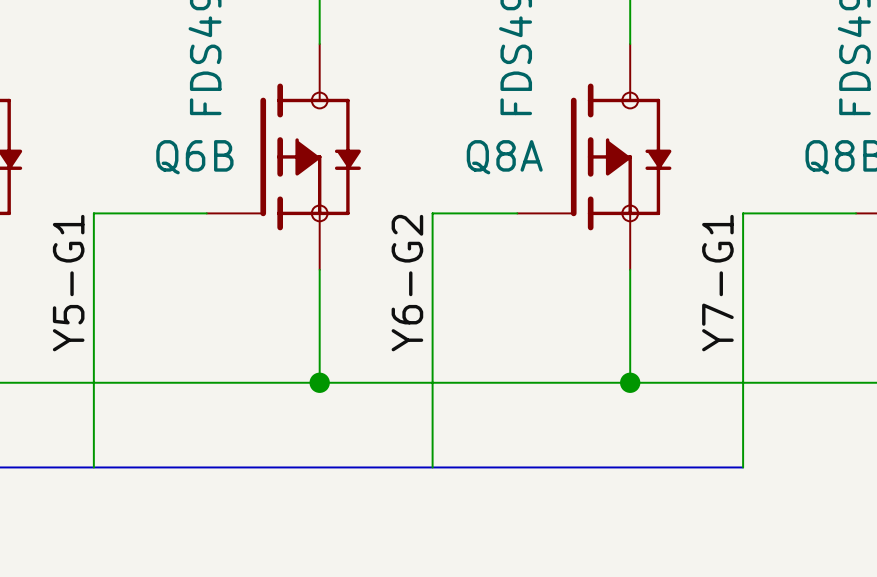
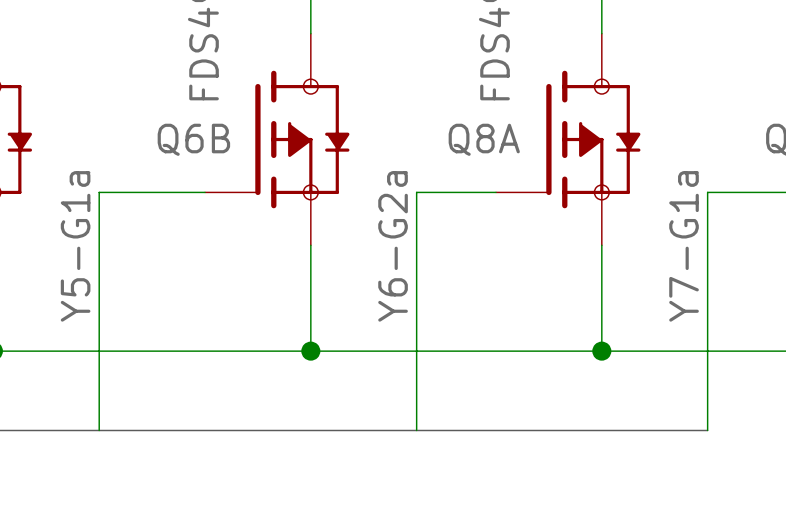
label: Y5-G1 (68, 283) -> Y5-G1a (75, 246)
label: Y6-G2 (407, 283) -> Y6-G2a (393, 246)
label: Y7-G1 (717, 283) -> Y7-G1a (684, 246)

